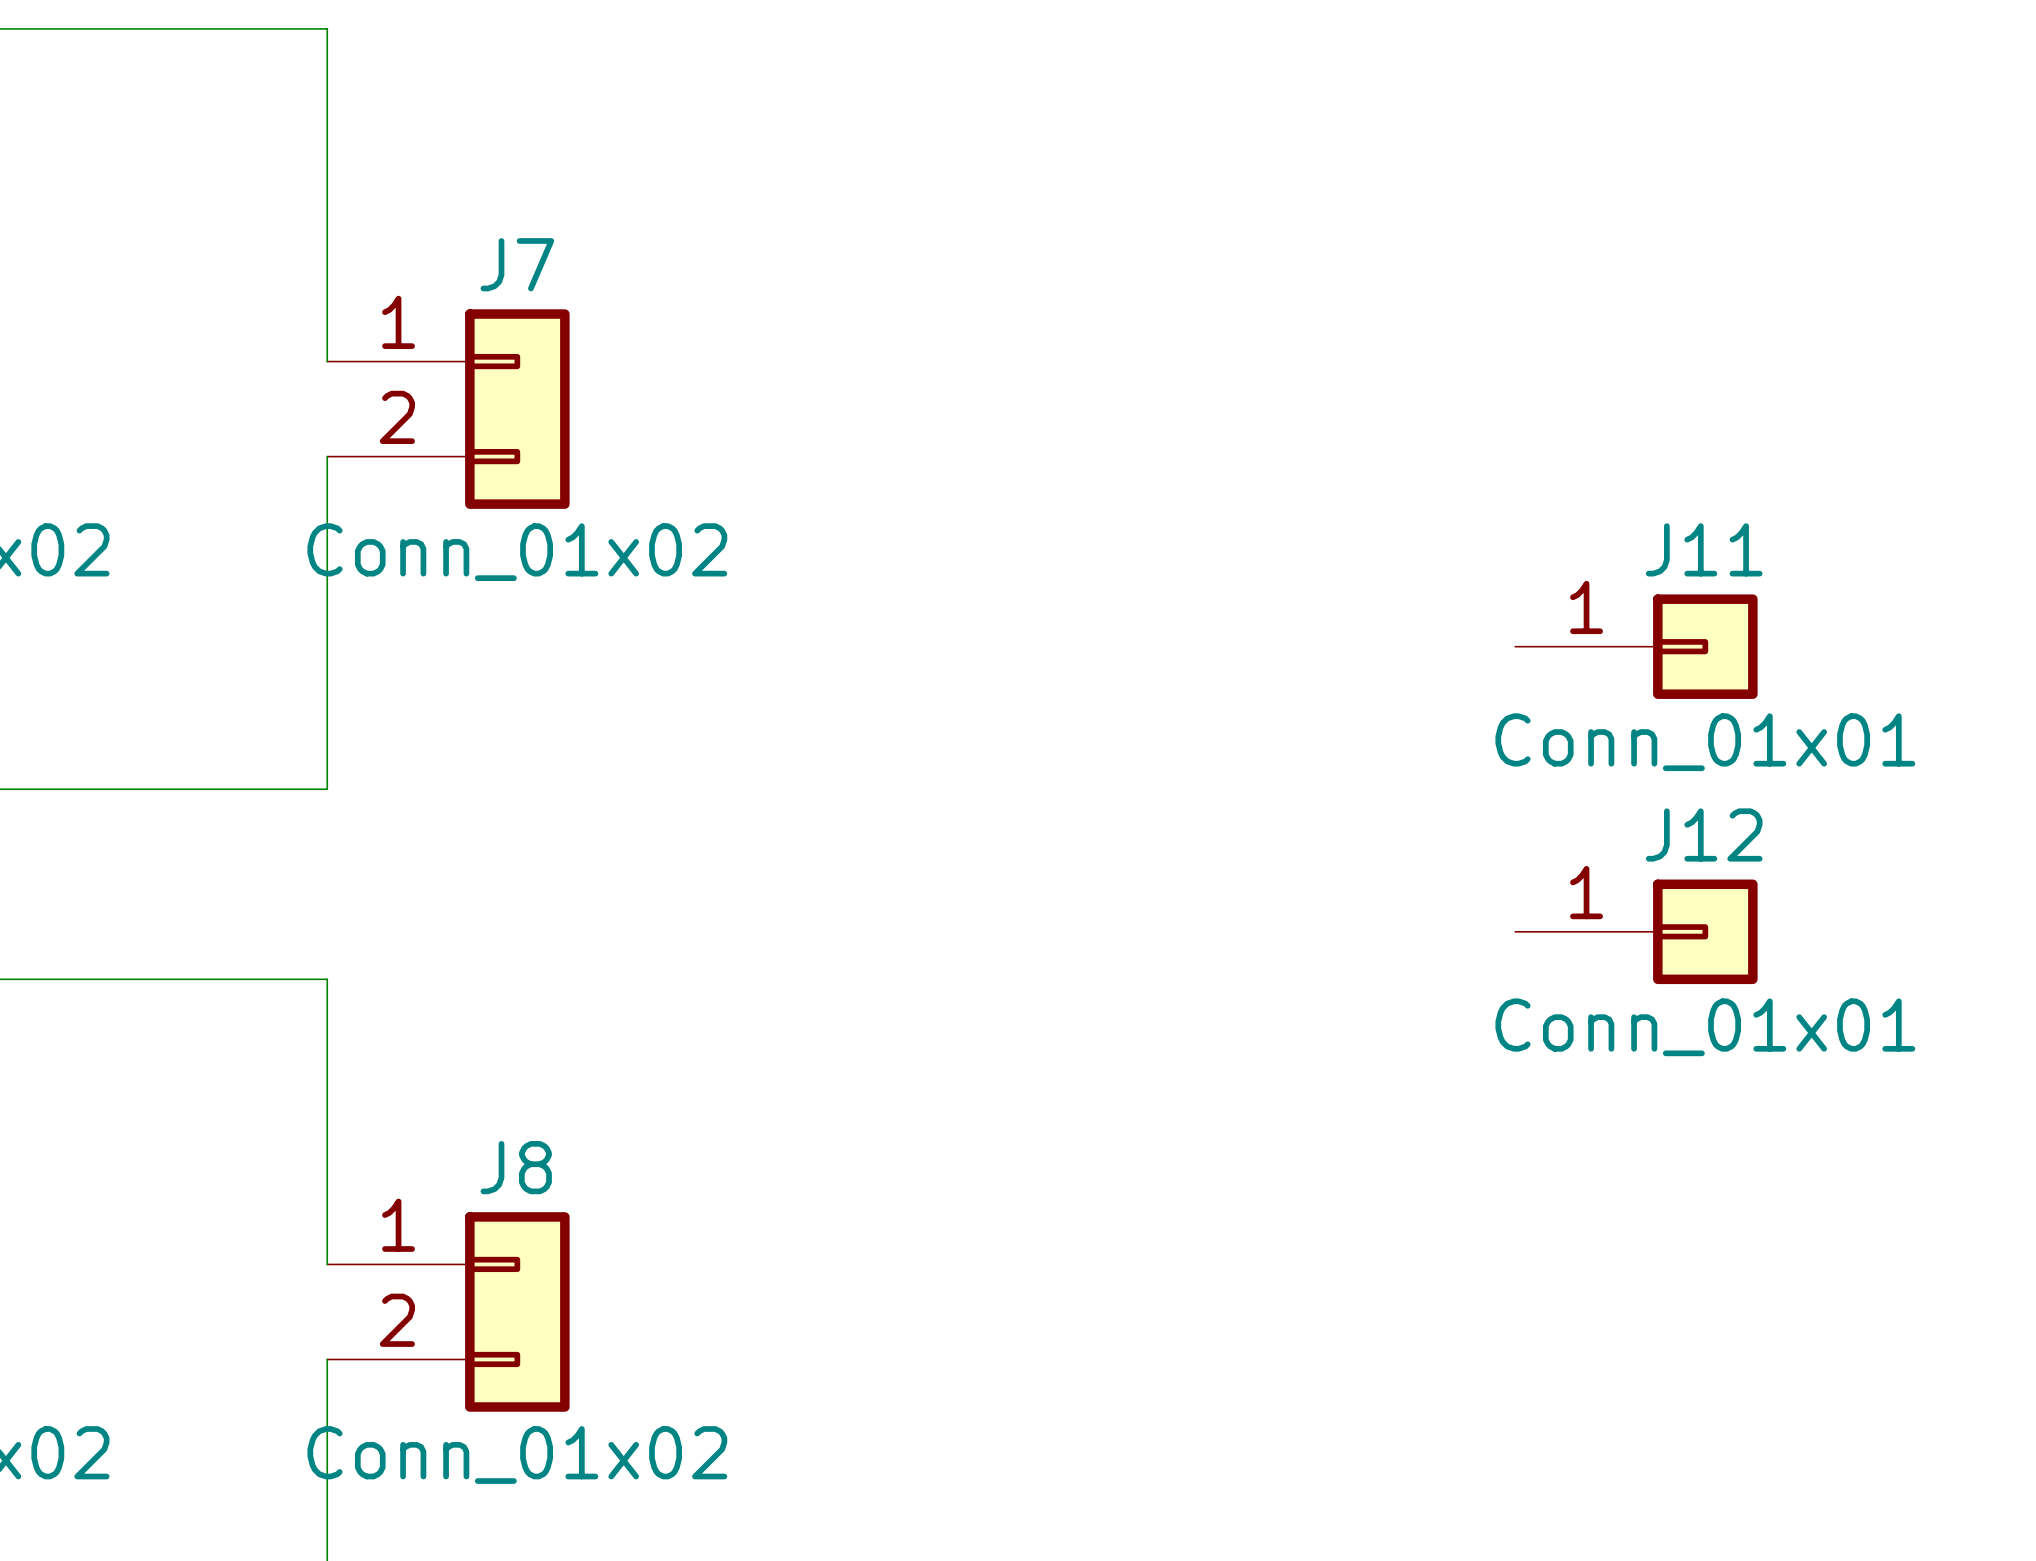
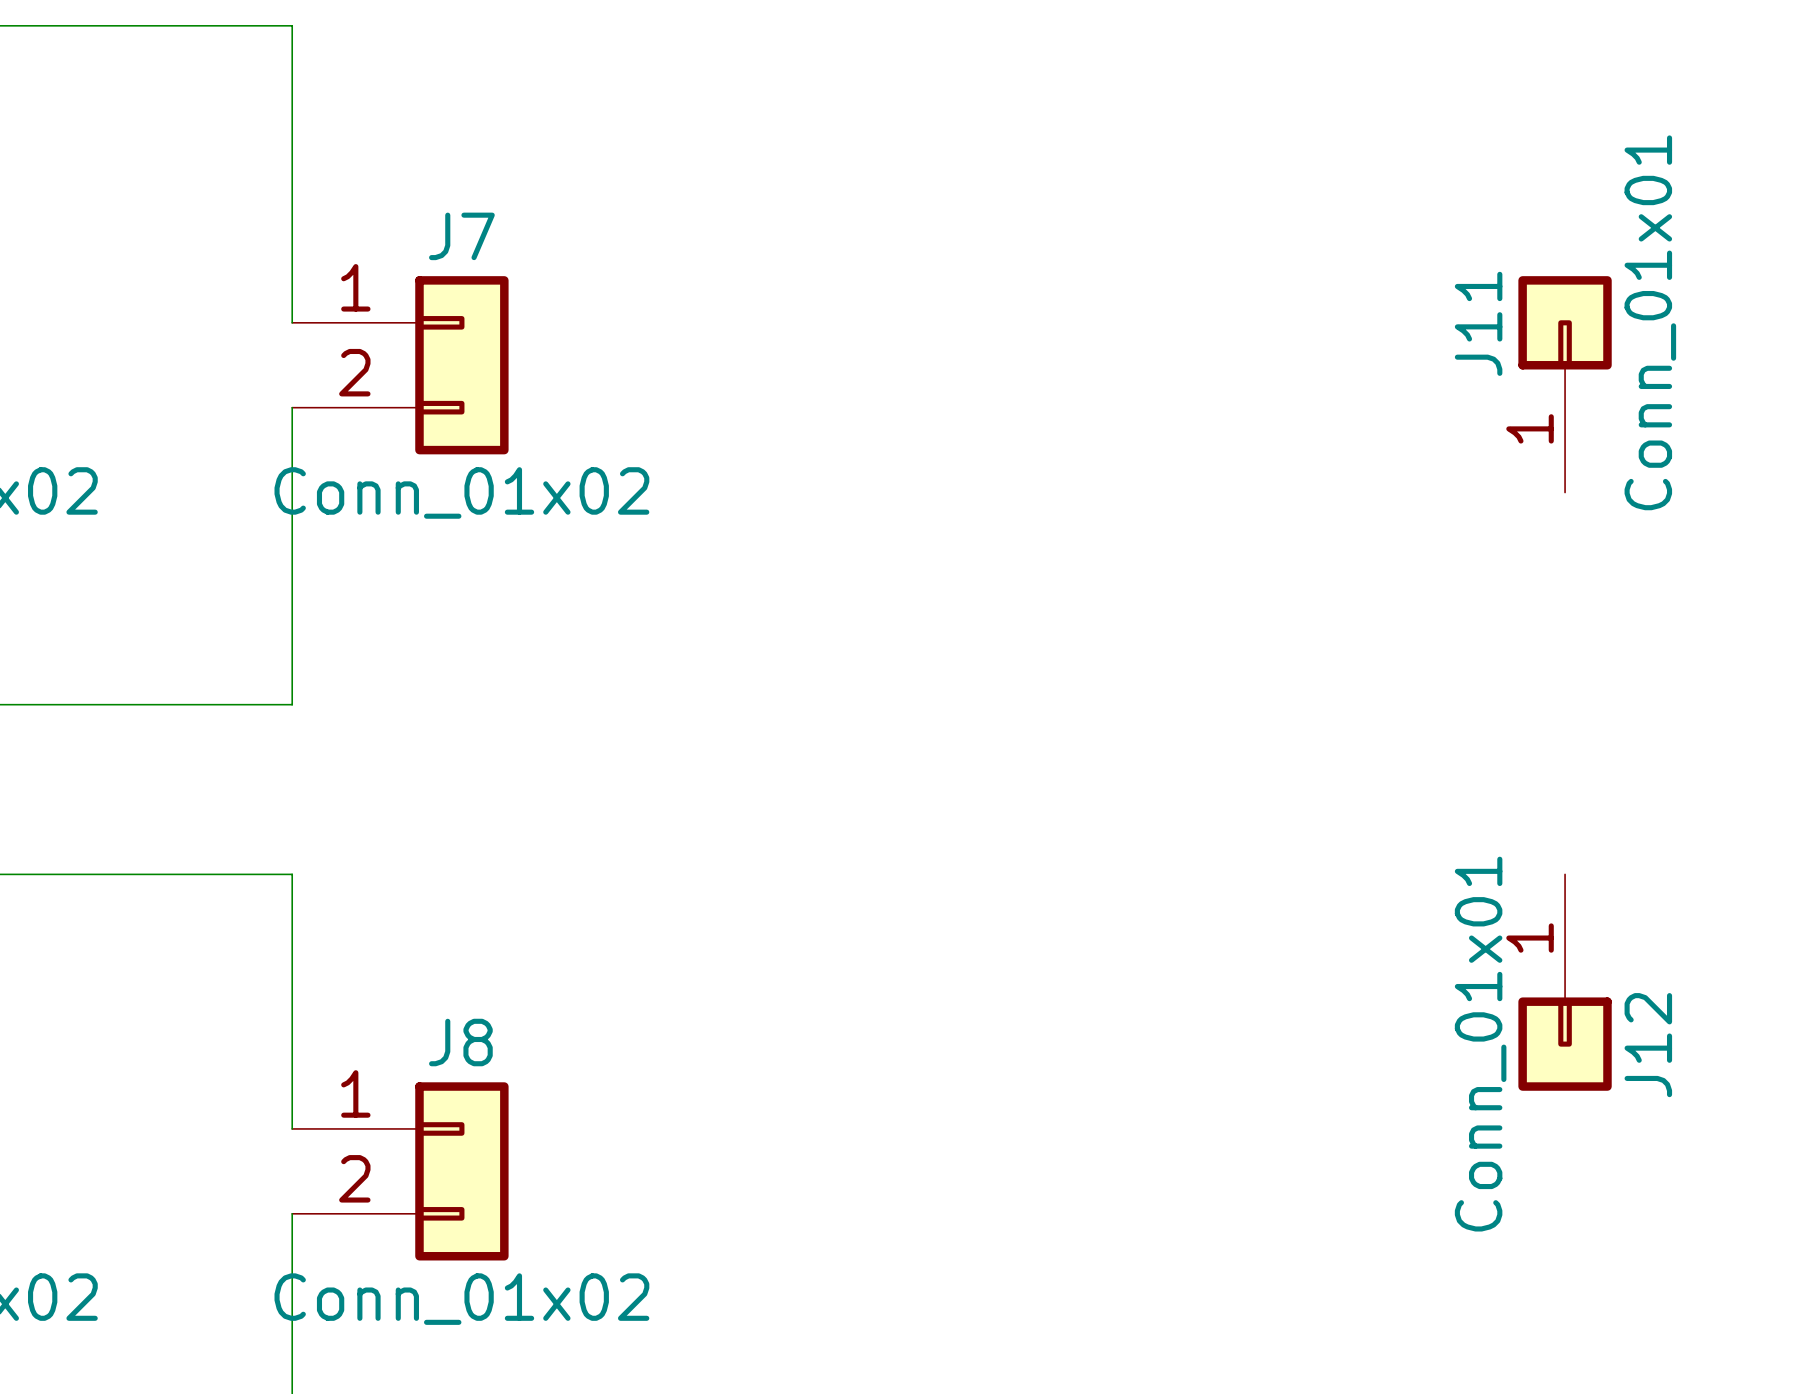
J11 position: (1636, 646) -> (1565, 384)
J11 rotation: 0° (1705, 646) -> 90° counterclockwise (1565, 322)
J12 position: (1636, 931) -> (1565, 982)
J12 rotation: 0° (1705, 931) -> 90° clockwise (1565, 1044)

